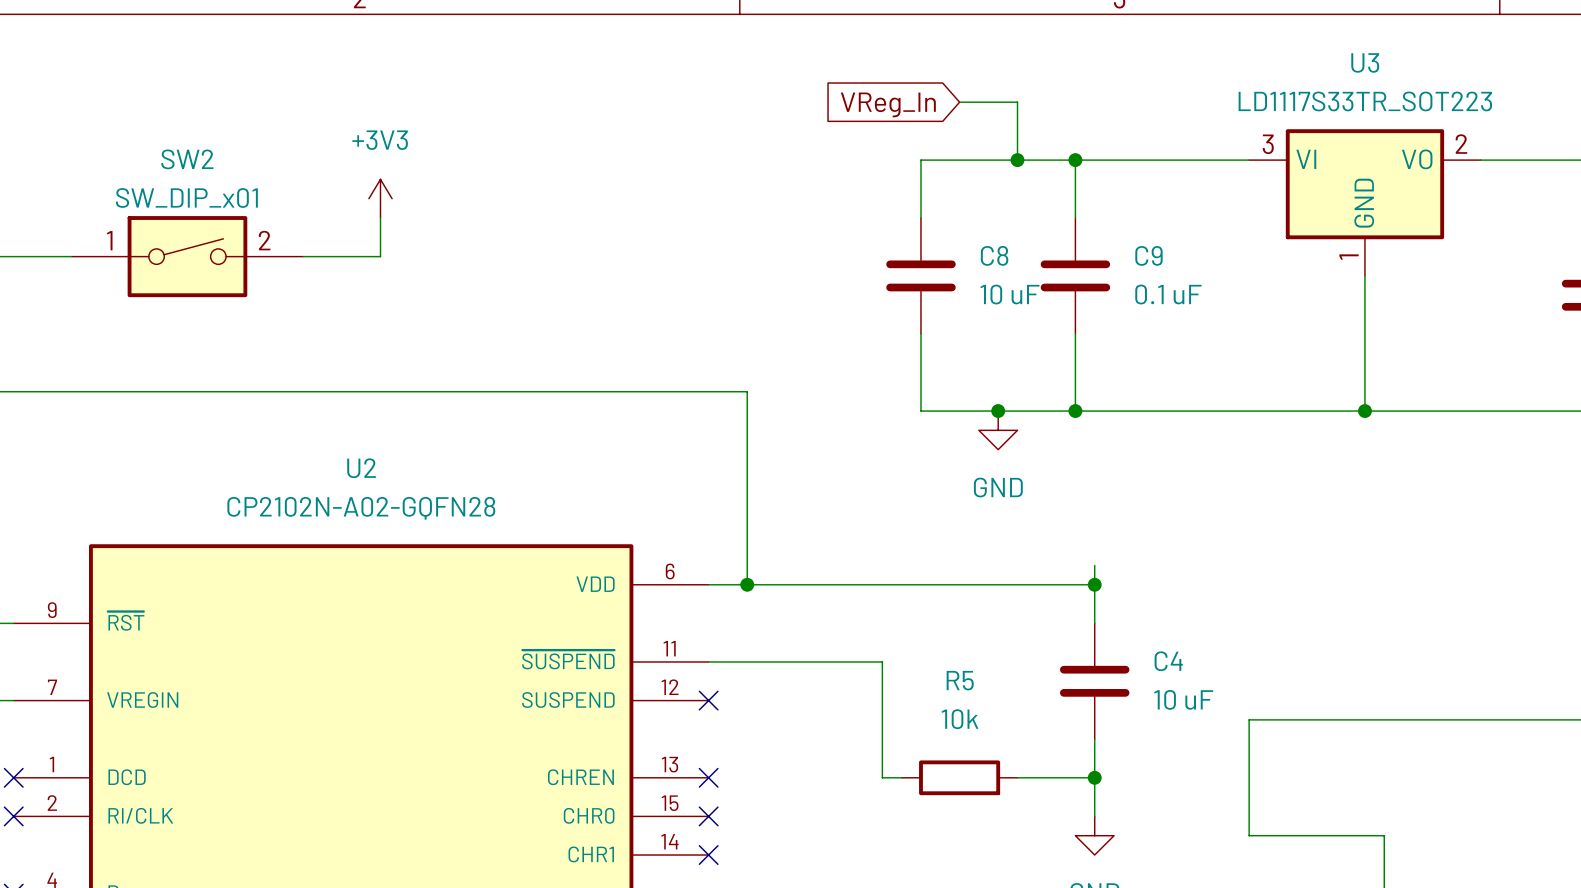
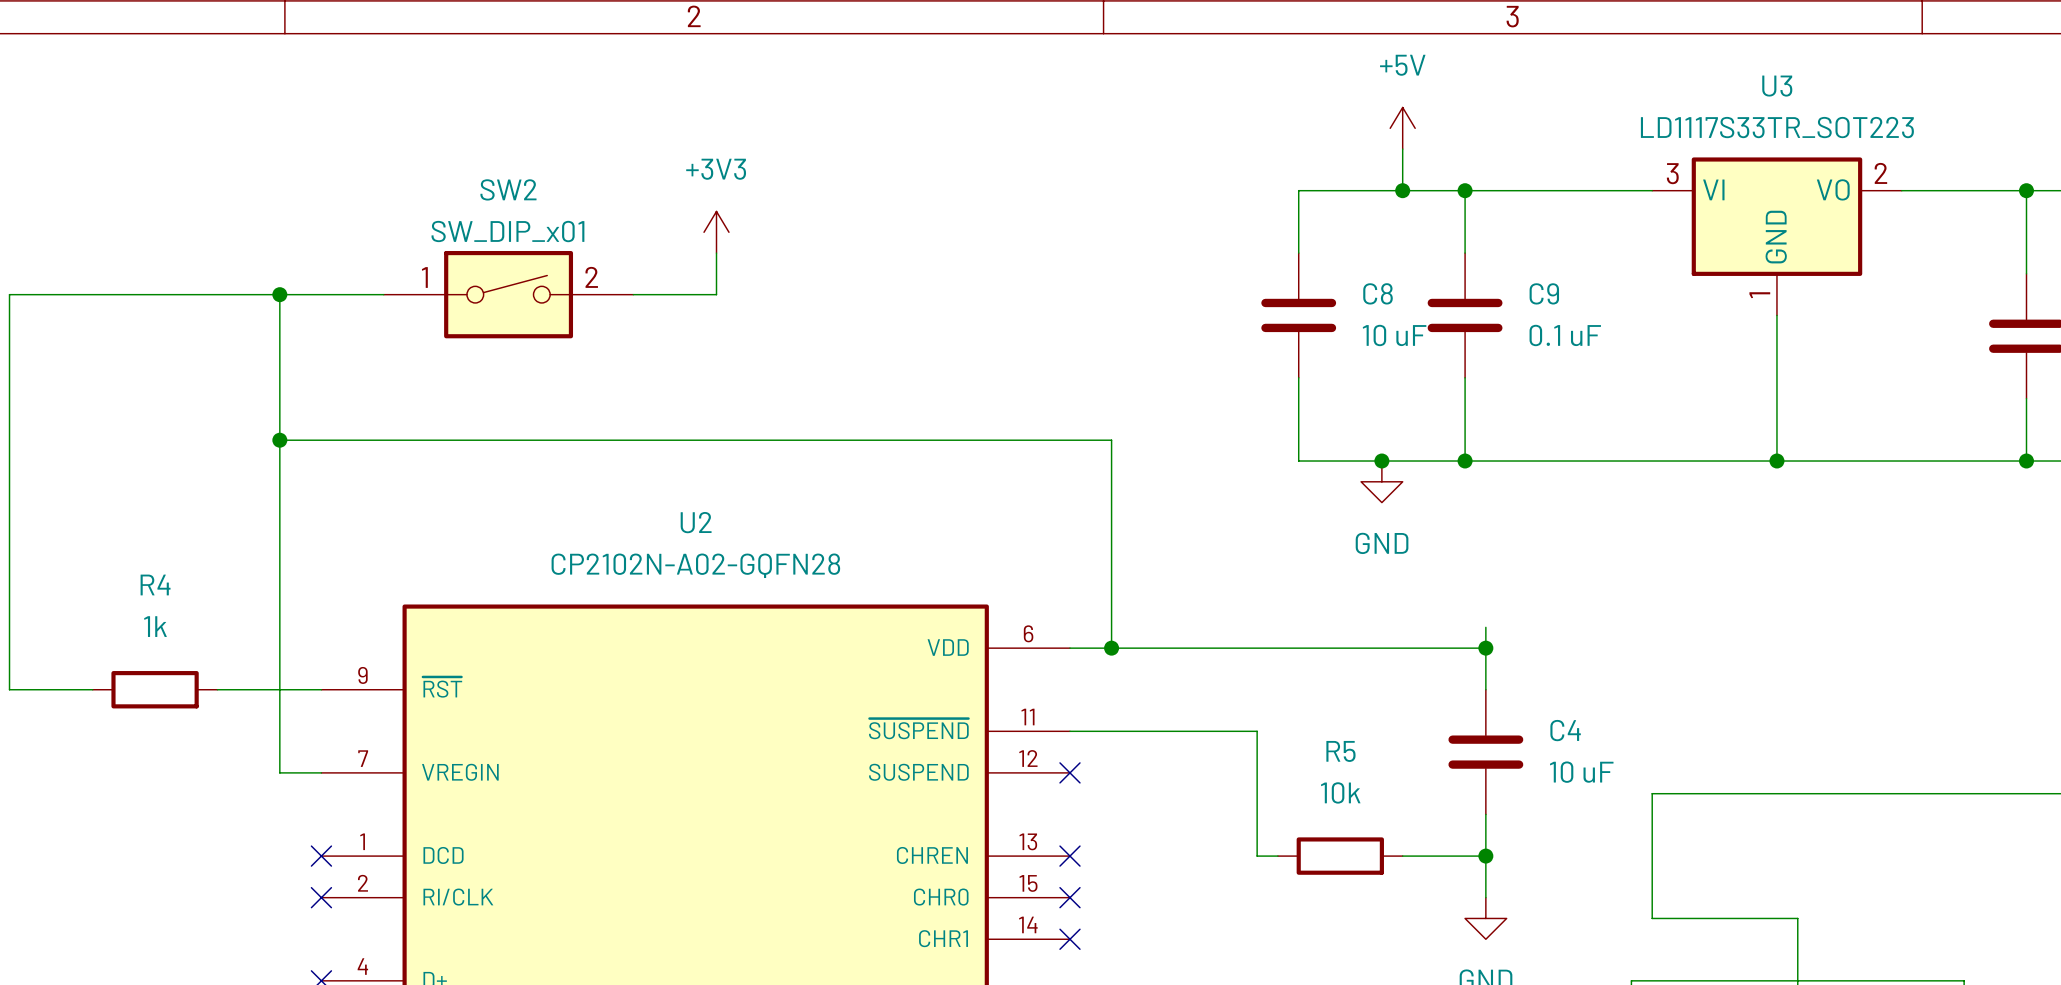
wire: (959, 102) (1017, 102) (1017, 121) -> none
power symbol: none -> +5V (1402, 128)
global label: VReg_In (888, 104) -> none

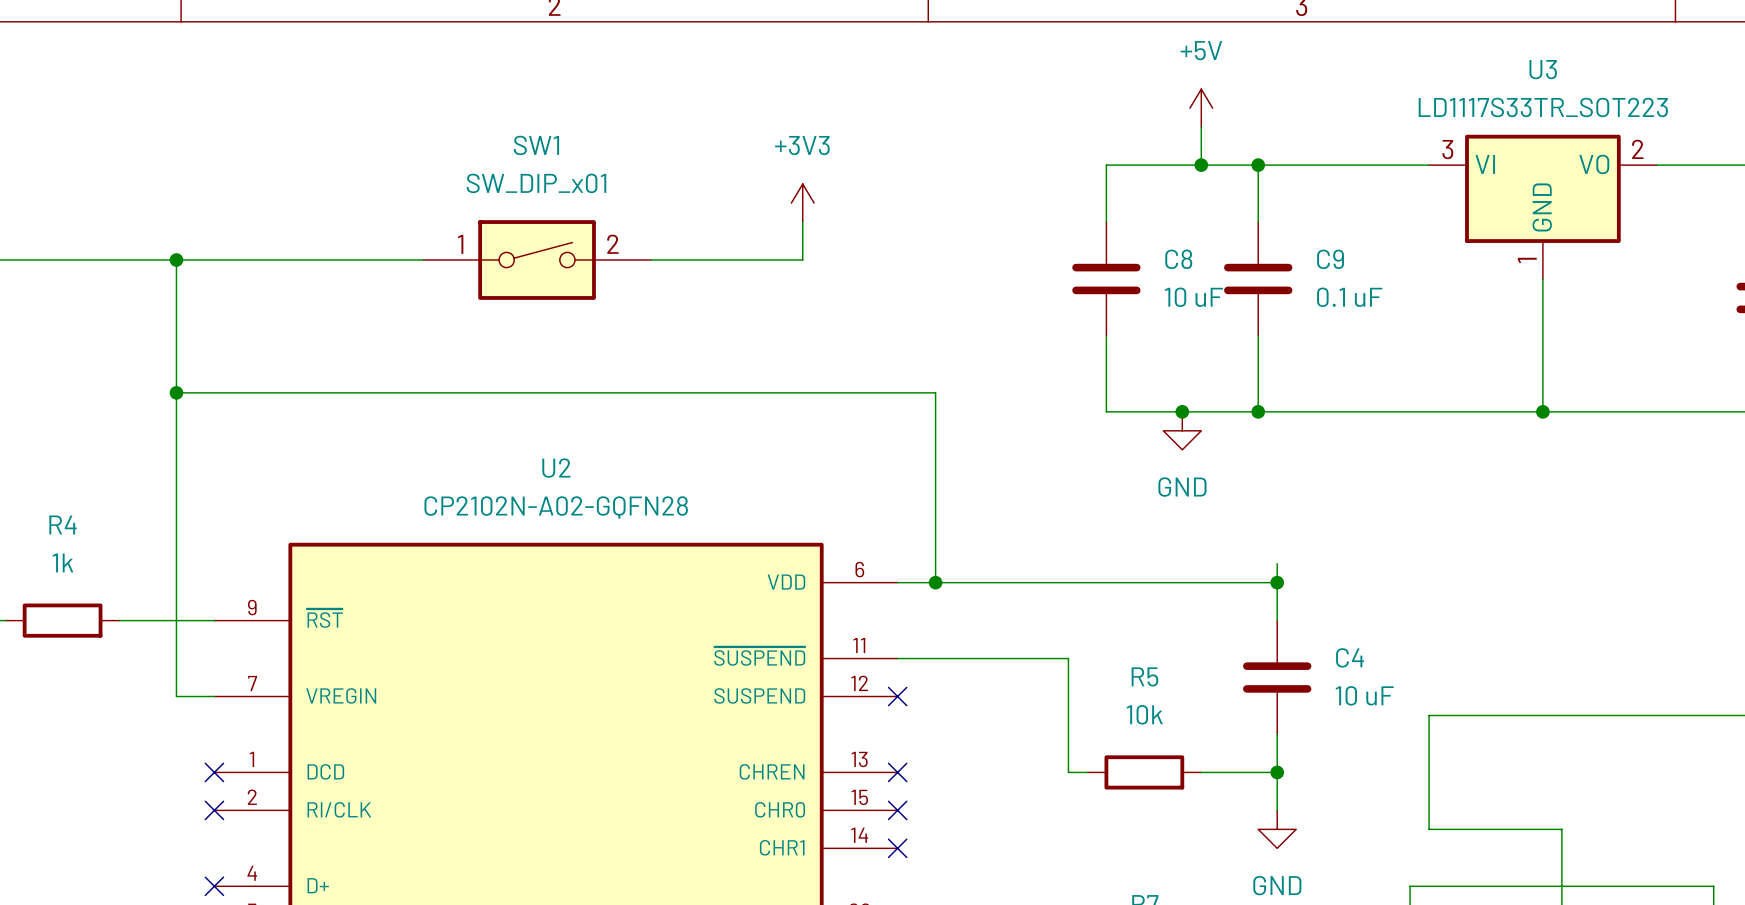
power symbol position: +3V3 (716, 232) -> +3V3 (802, 203)
wire: none -> (802, 222) (802, 260) (650, 260)
SW2: SW_DIP_x01 (508, 294) -> none
SW1: none -> SW_DIP_x01 (537, 260)

